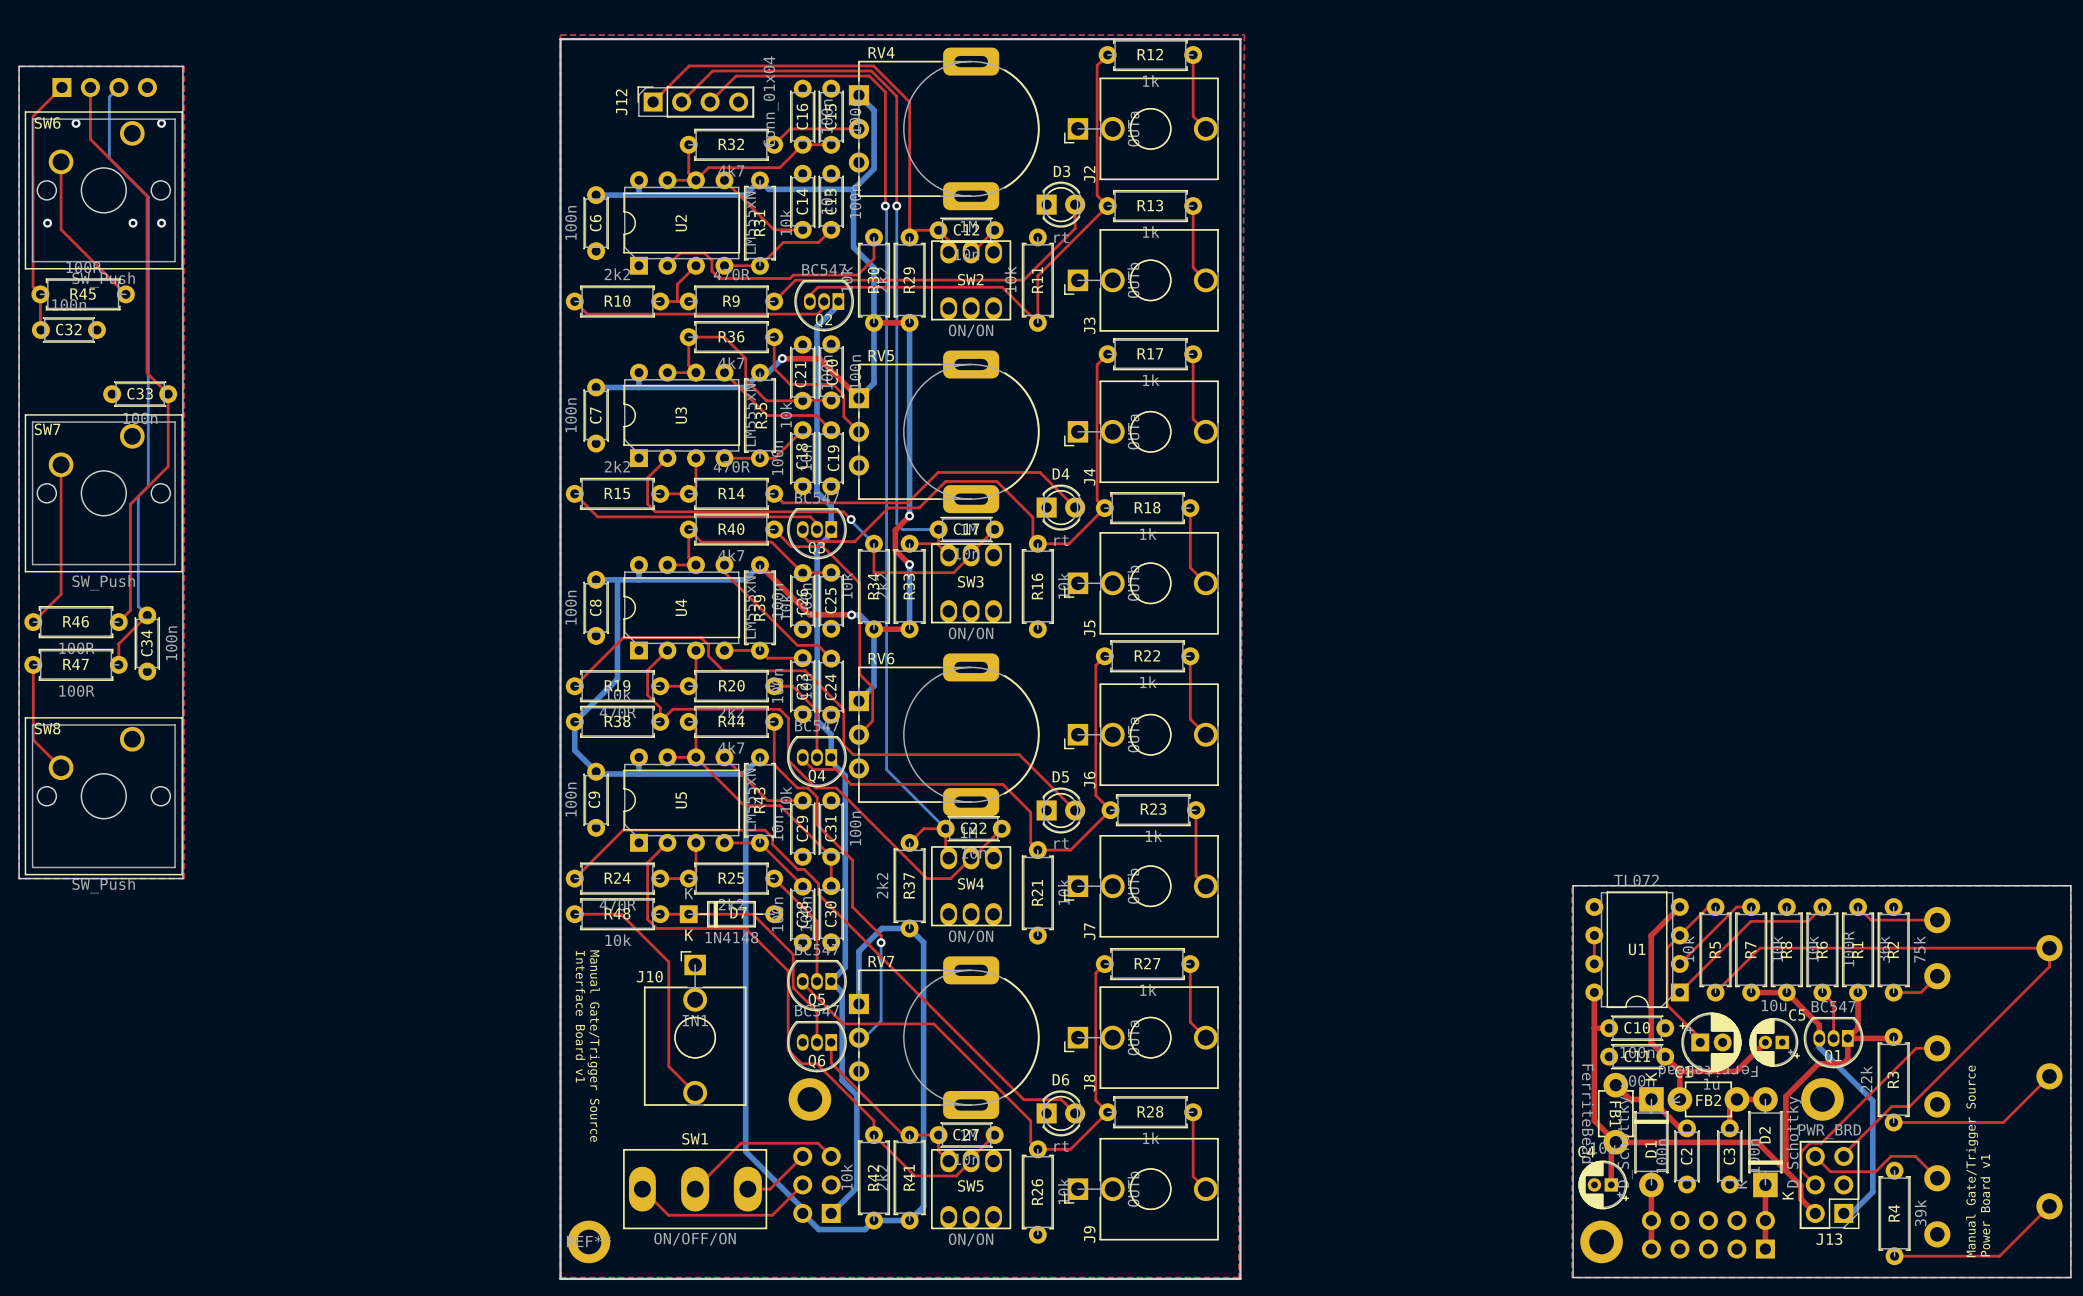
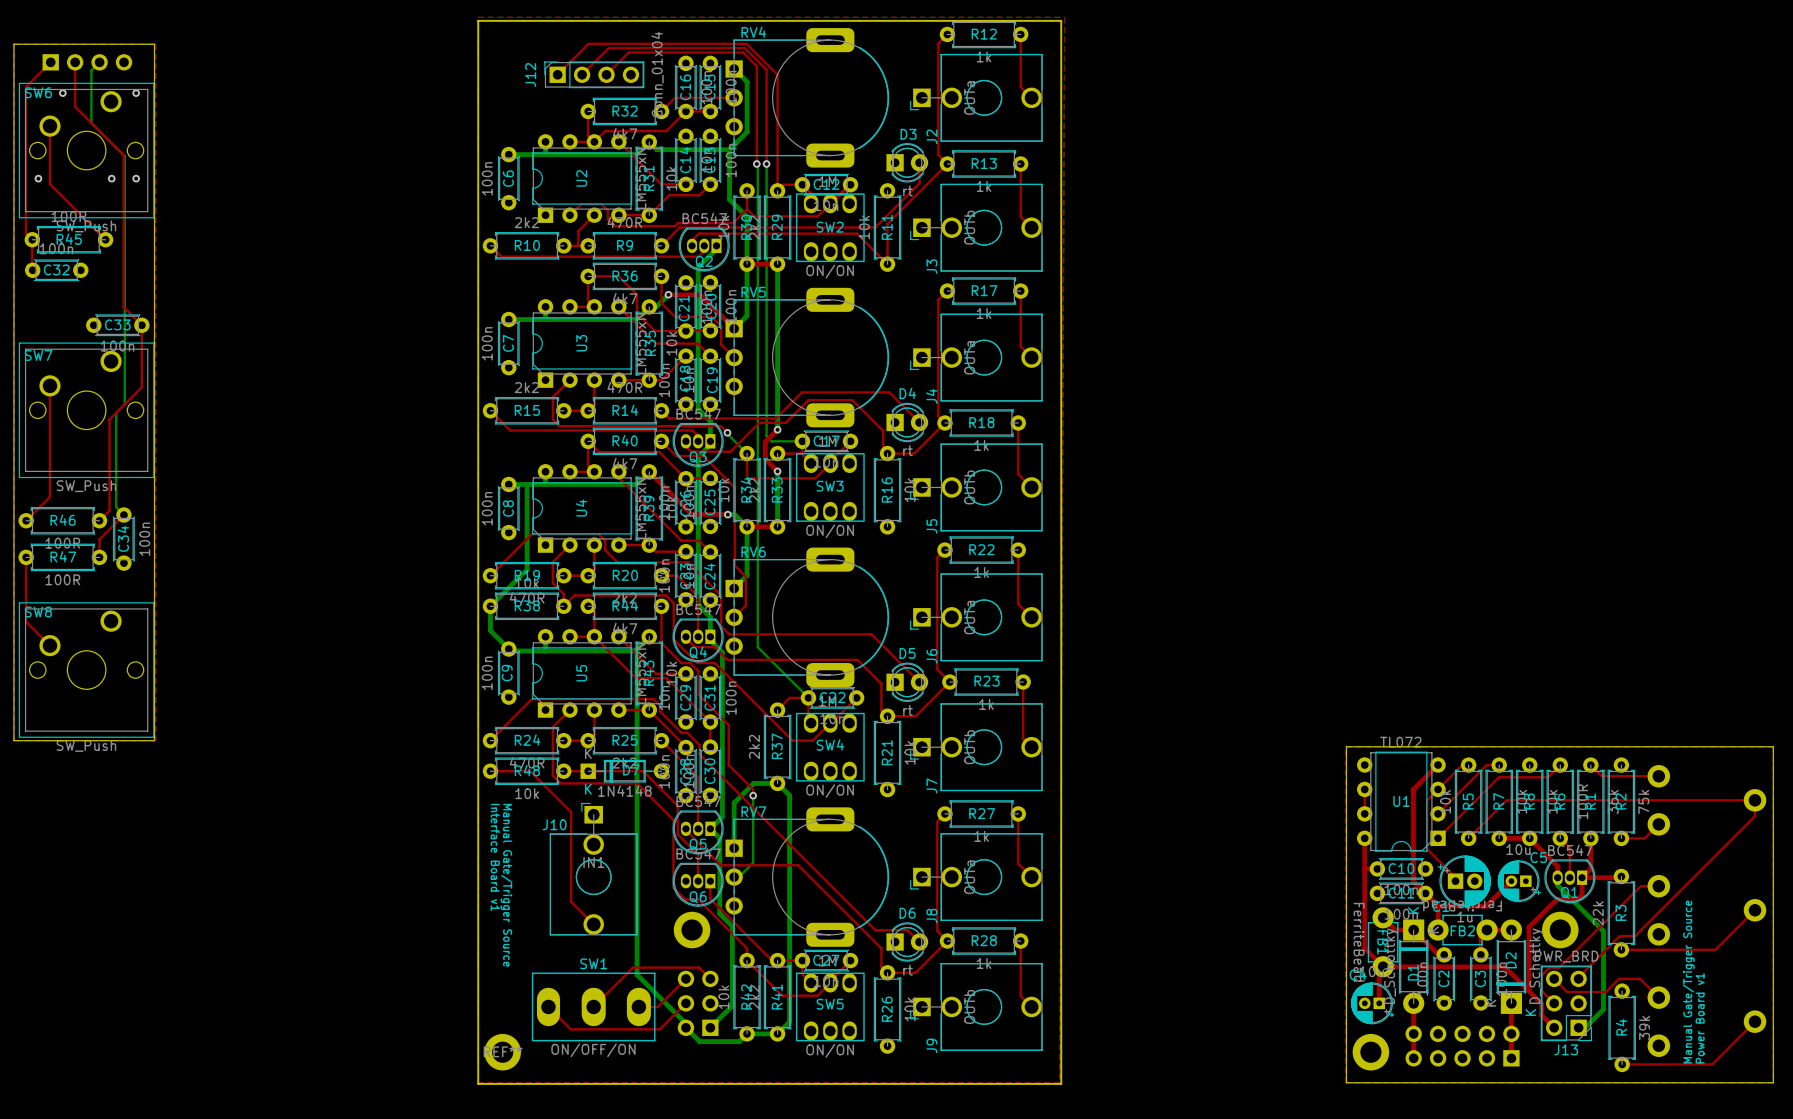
top track: none -> (850, 182) (817, 216) (754, 216) (747, 209)

